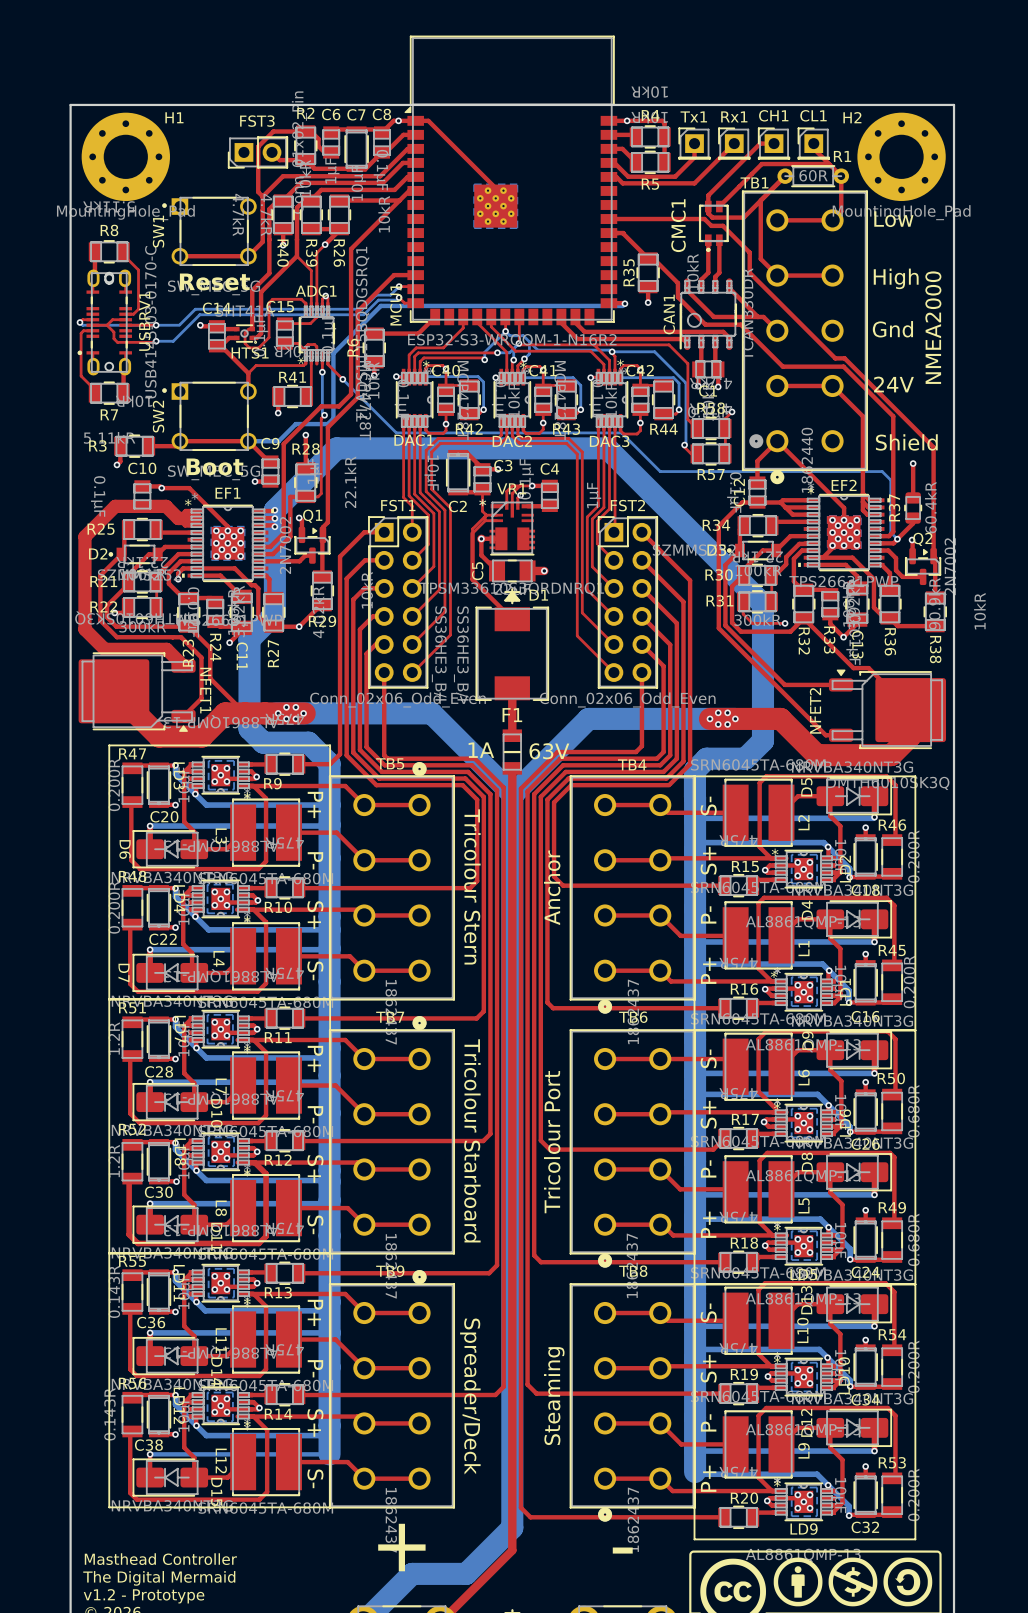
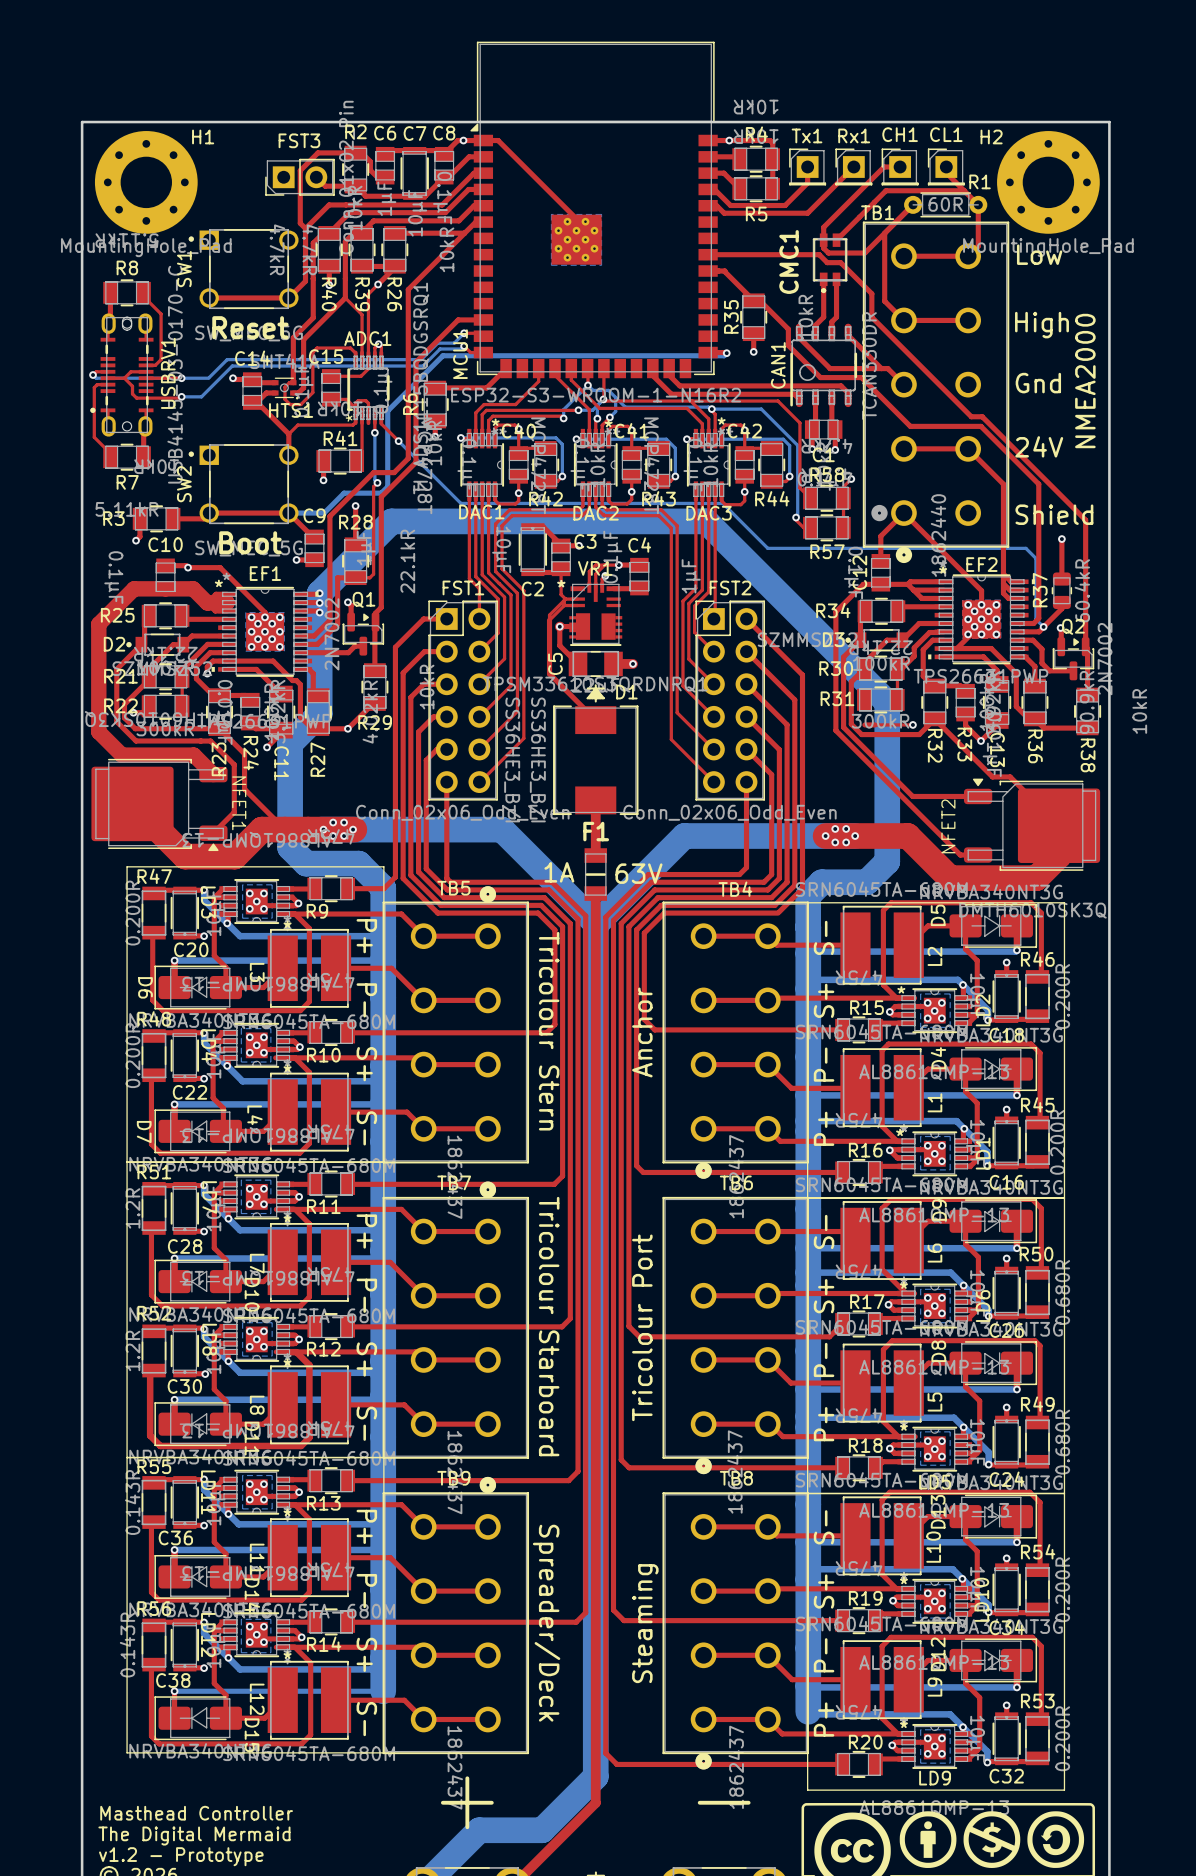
top track: (743, 601) (743, 614) (752, 623) -> (864, 724) (875, 724)

